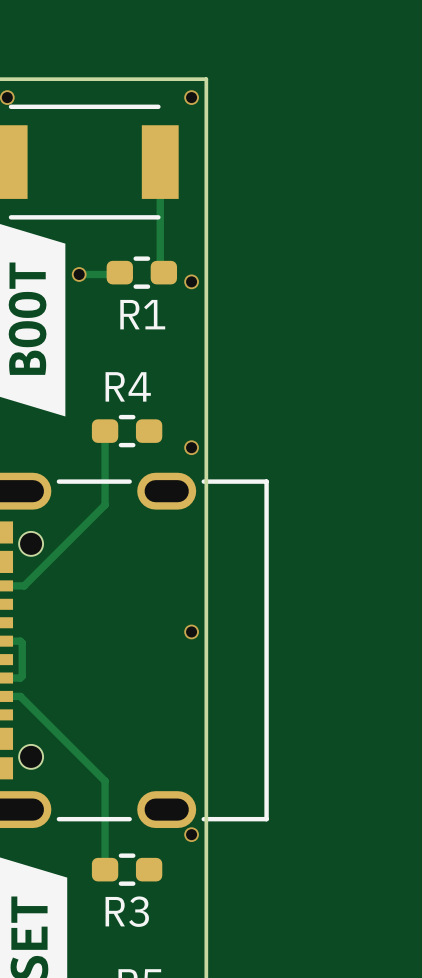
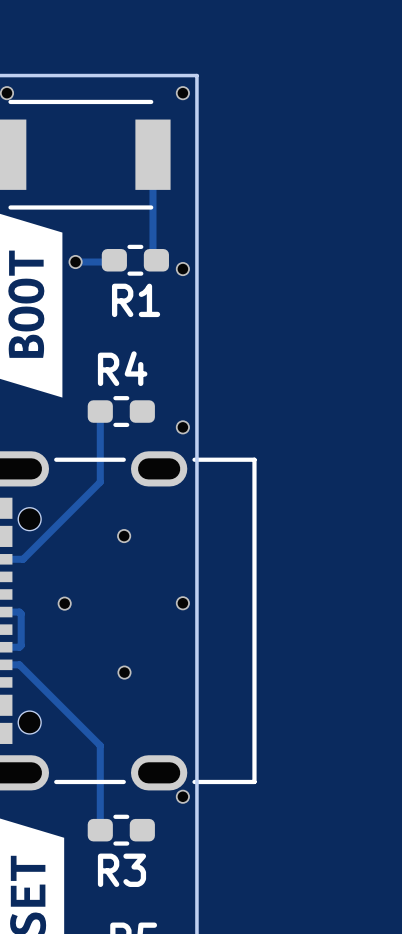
via: none -> (124, 536)
via: none -> (64, 603)
via: none -> (124, 672)

